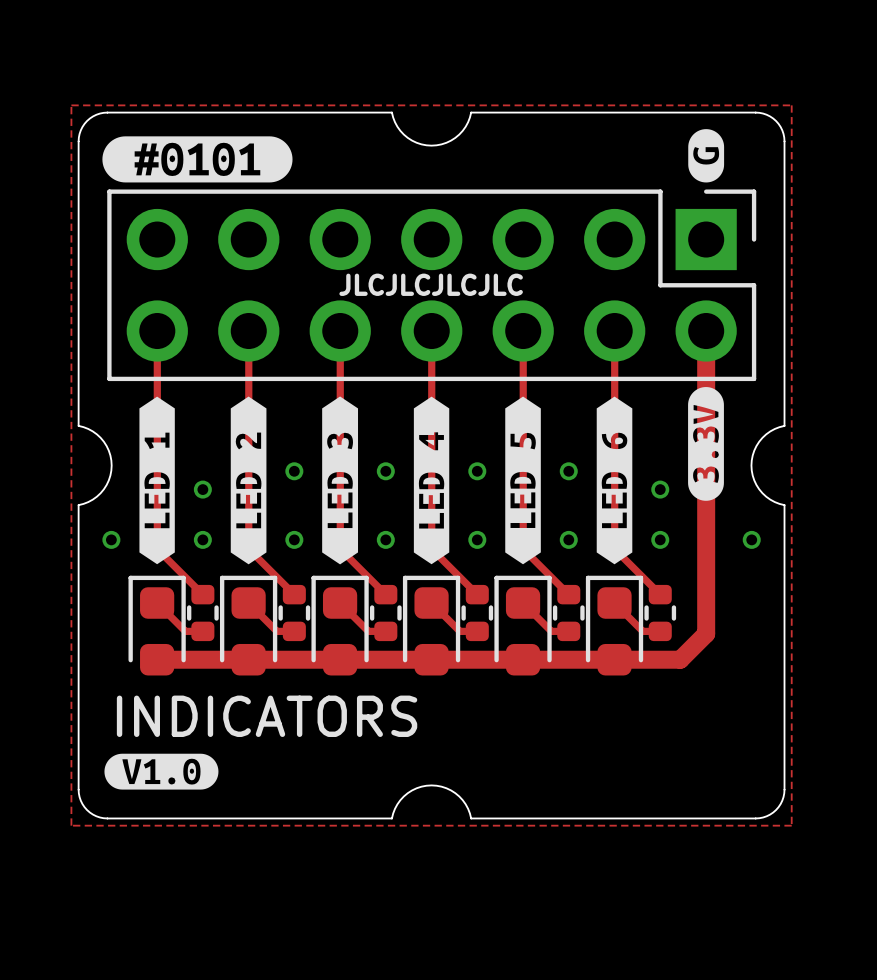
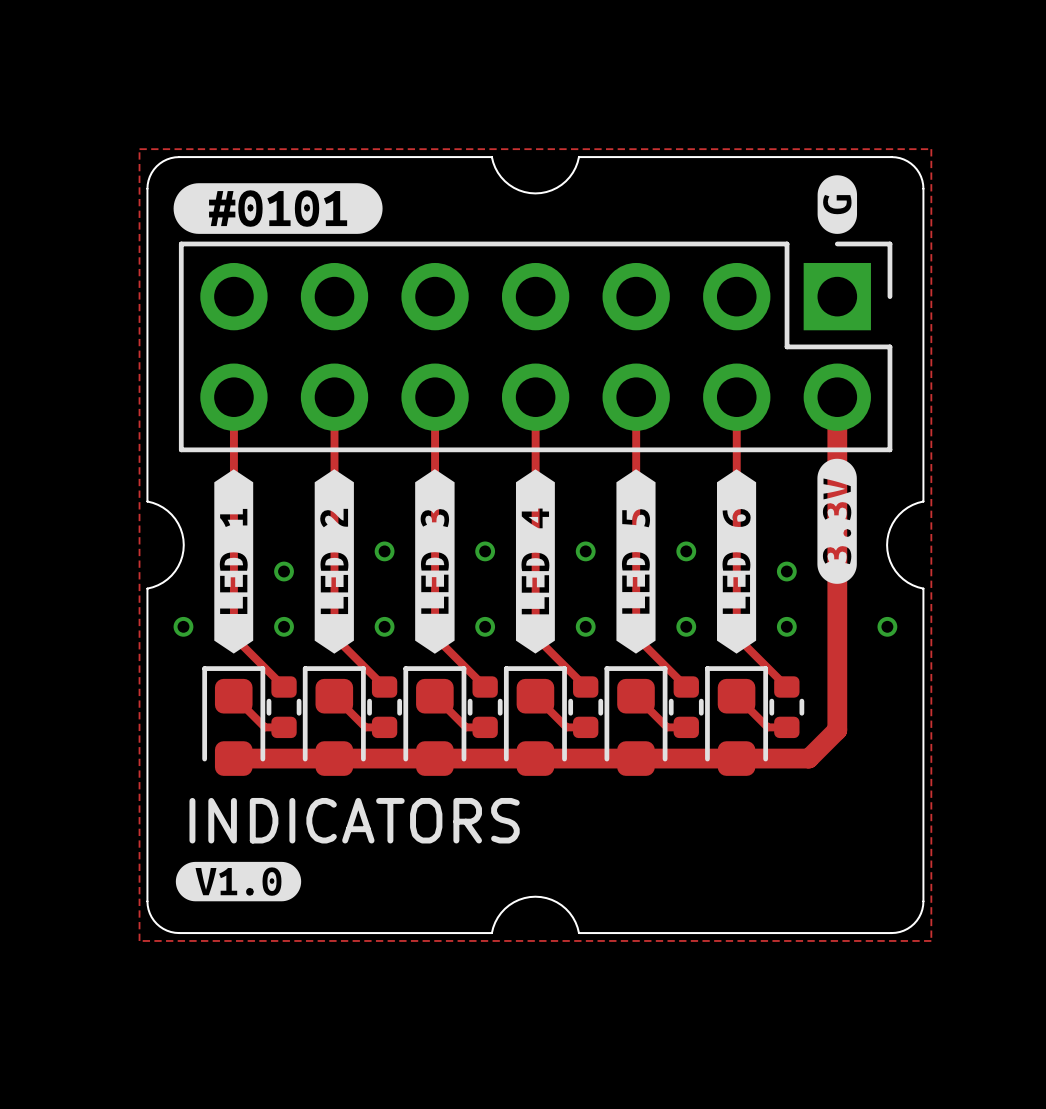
text: JLCJLCJLCJLC (431, 284) -> none

